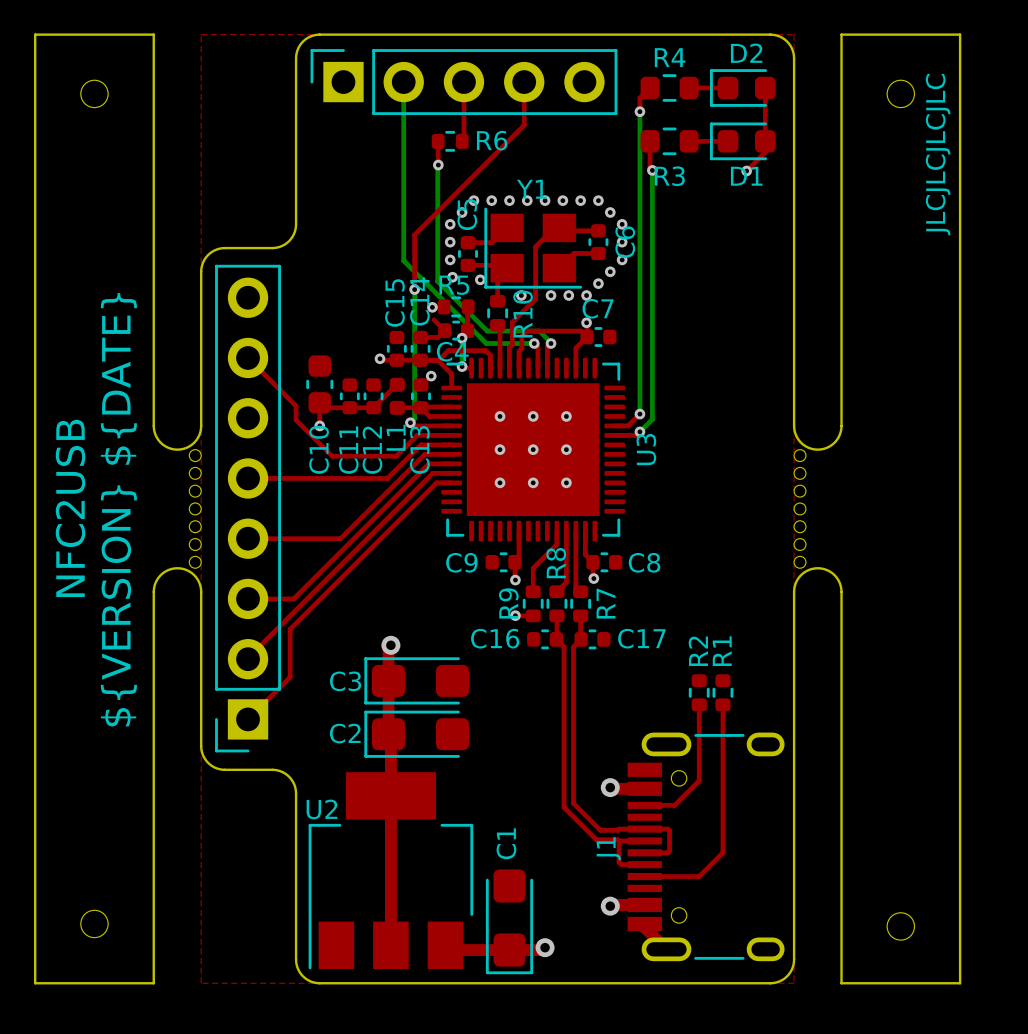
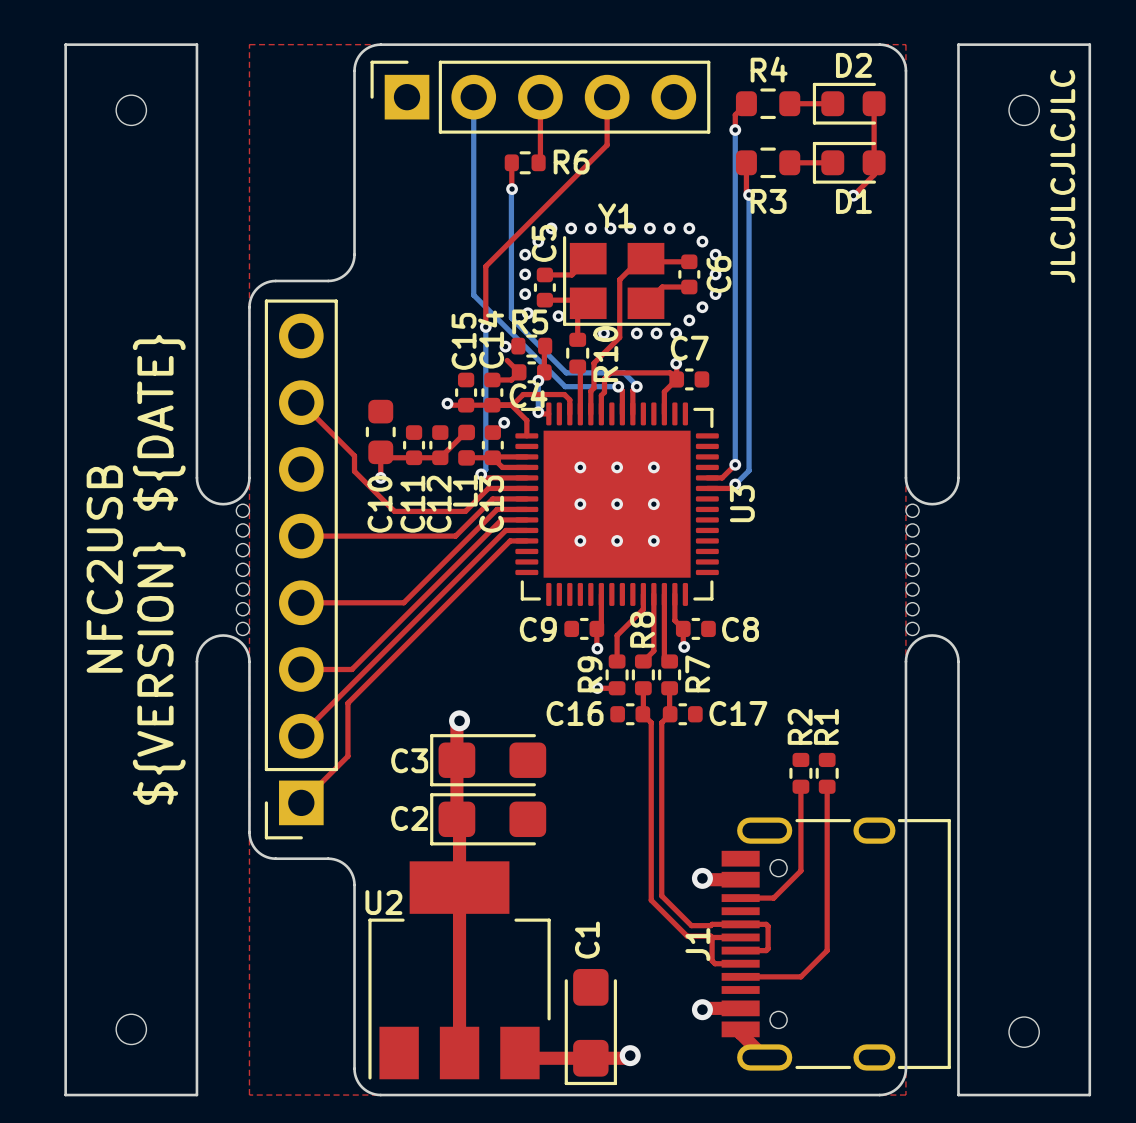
J1 footprint: [627, 732, 785, 962] -> [721, 817, 951, 1071]

